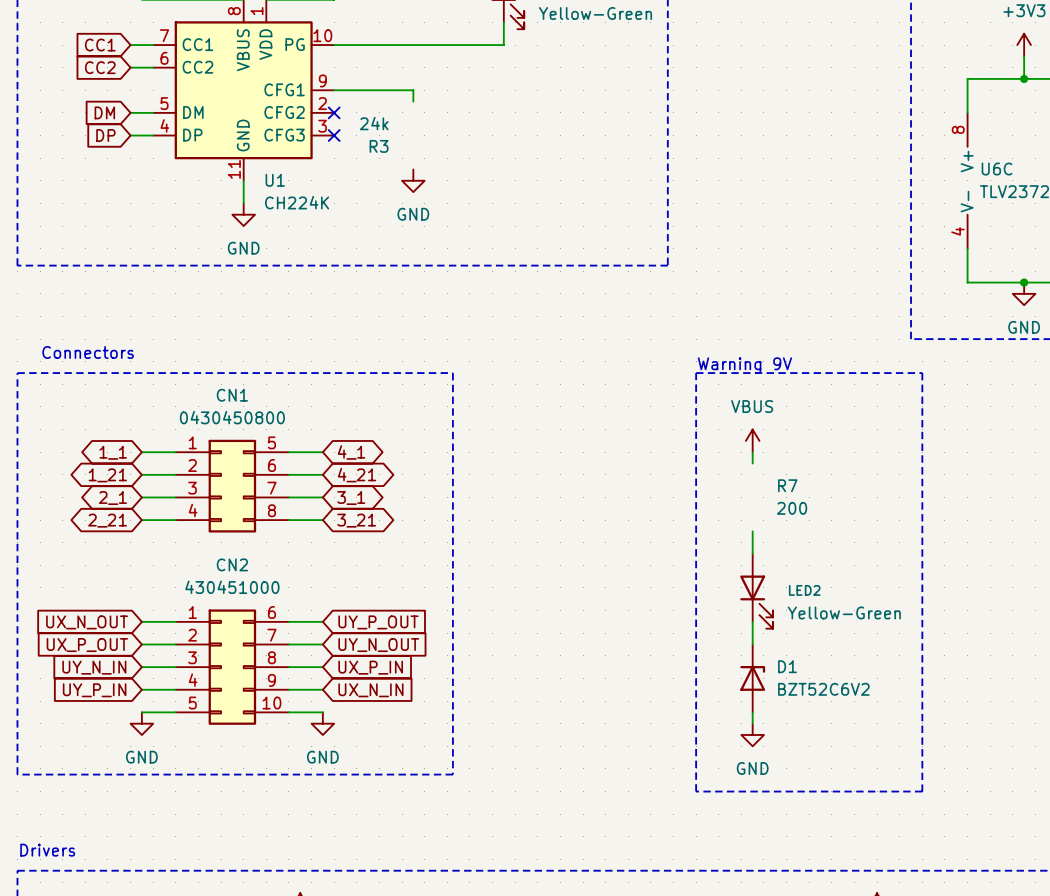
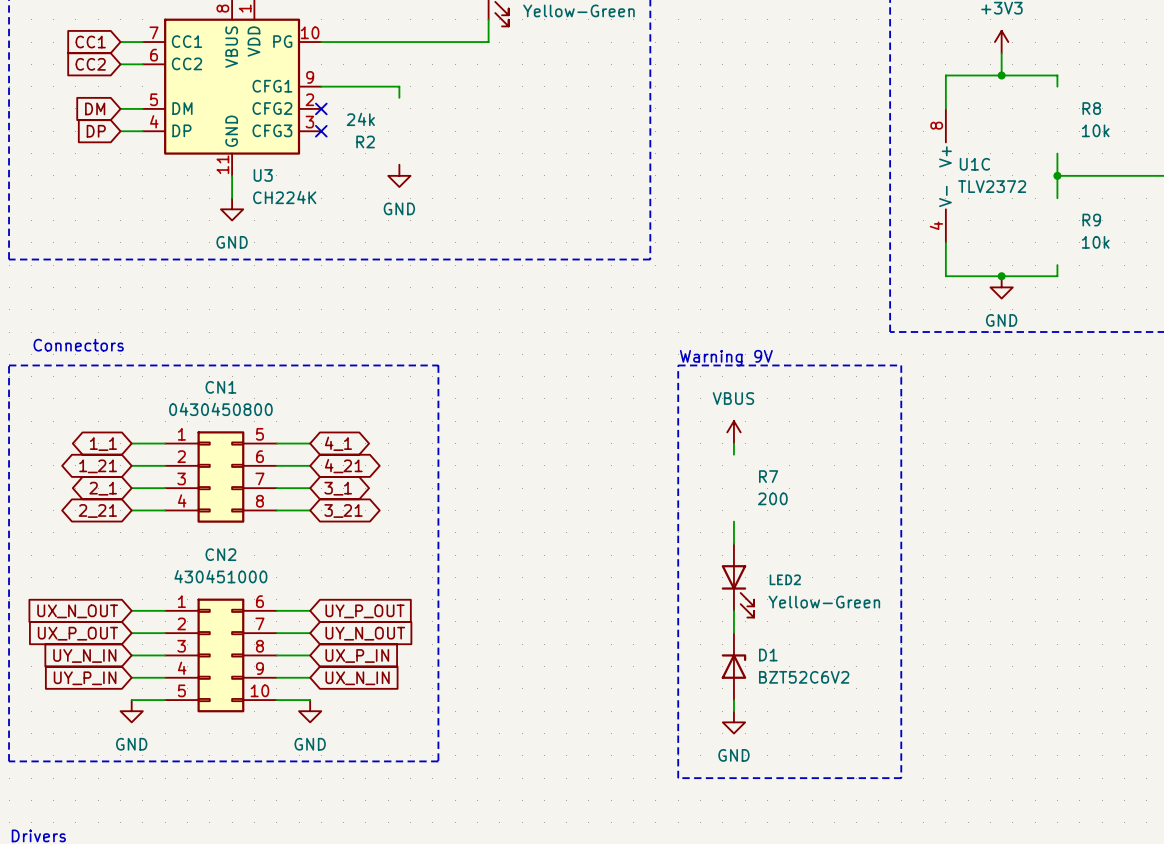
R3 name: R3 (379, 146) -> R2 (365, 141)
U6C name: U6C (997, 169) -> U1C (974, 164)
U1 name: U1 (275, 180) -> U3 (263, 175)

